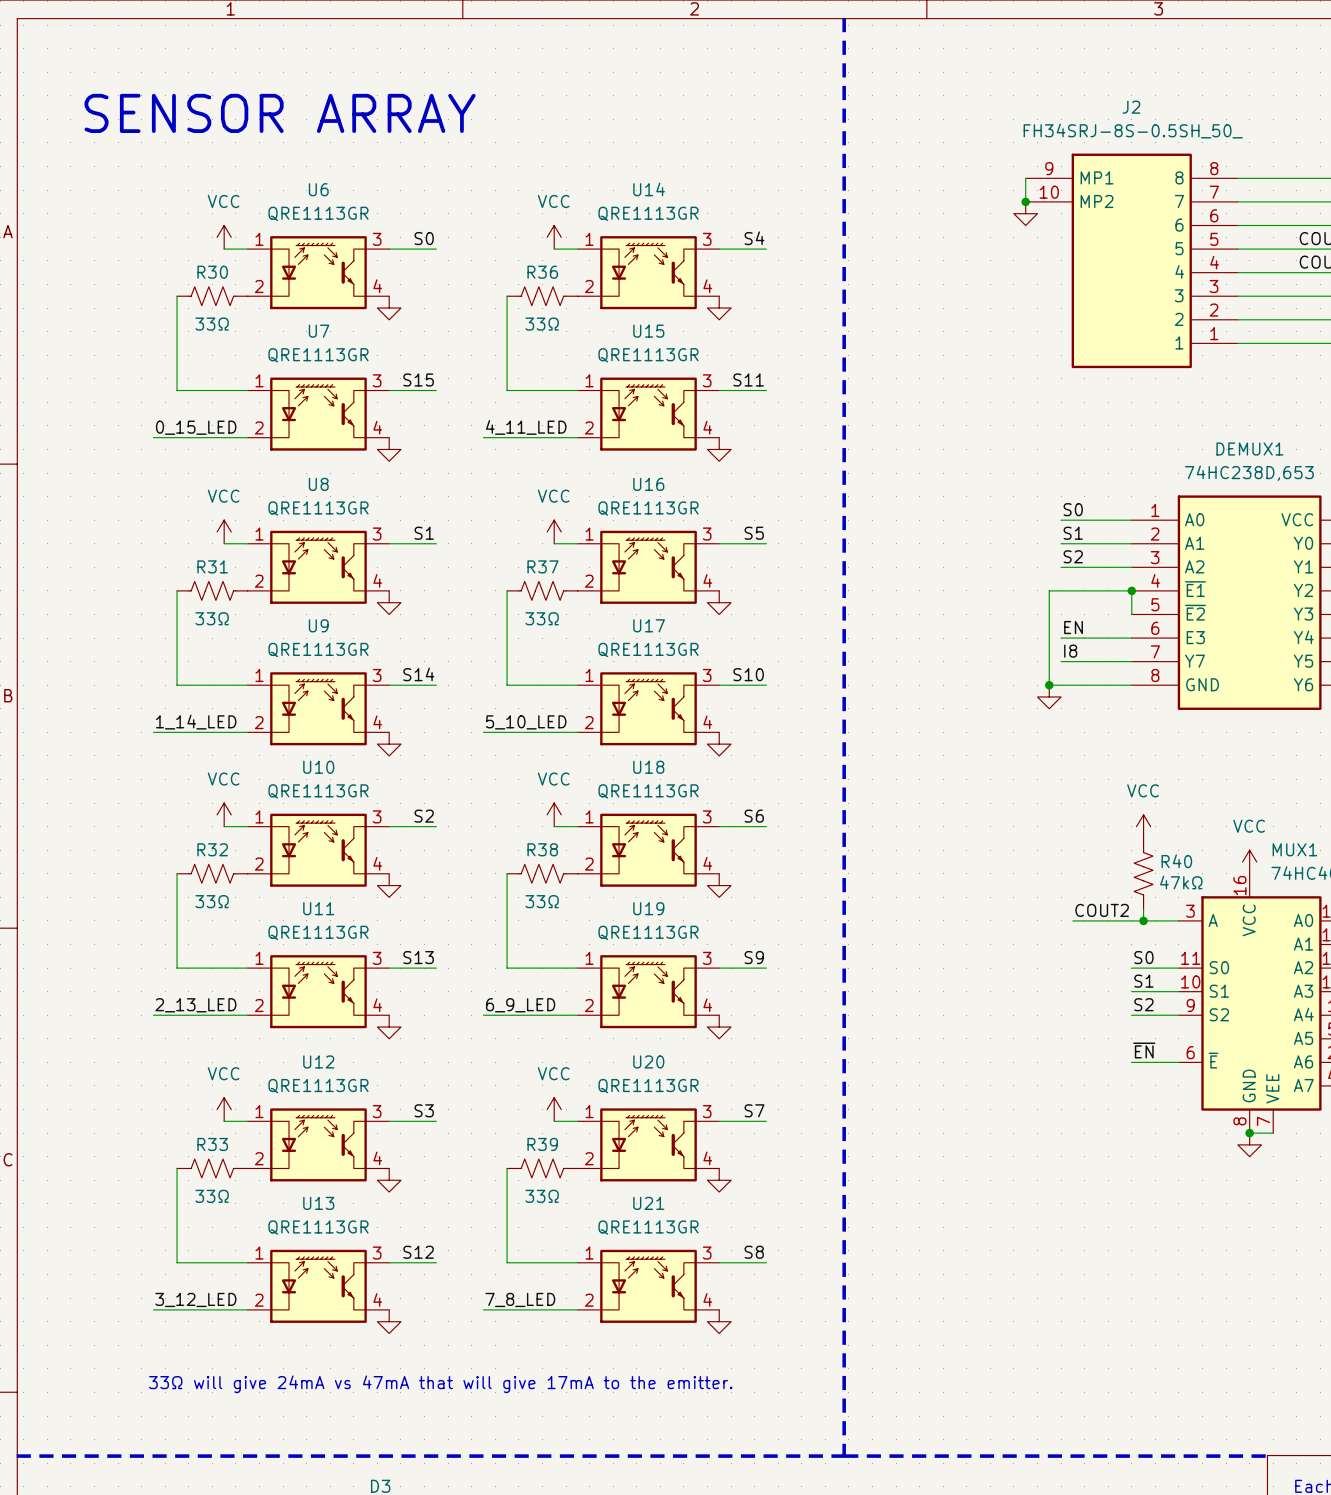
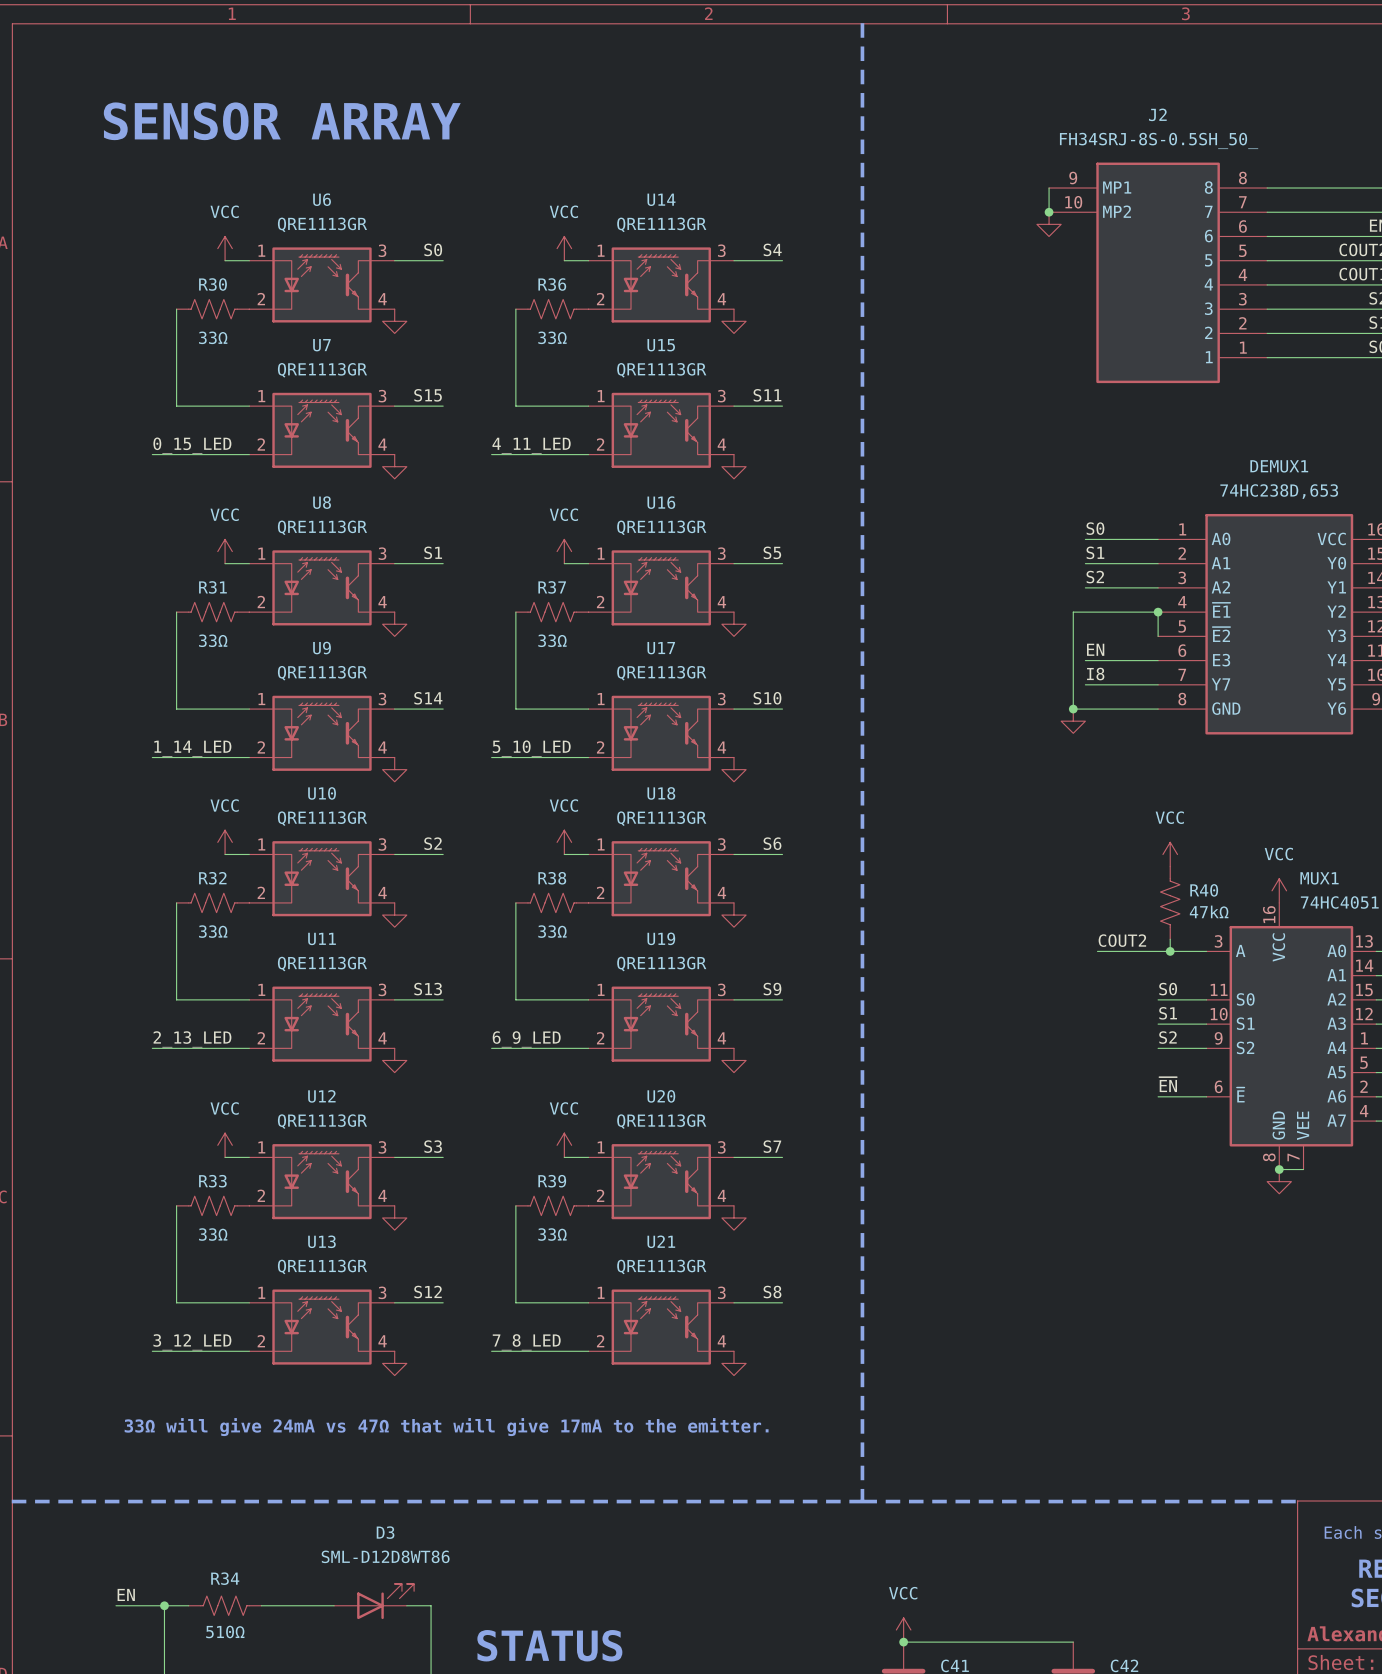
text: 33Ω will give 24mA vs 47mA that will give 17mA to the emitter. (440, 1384) -> 33Ω will give 24mA vs 47Ω that will give 17mA to the emitter. (446, 1427)

